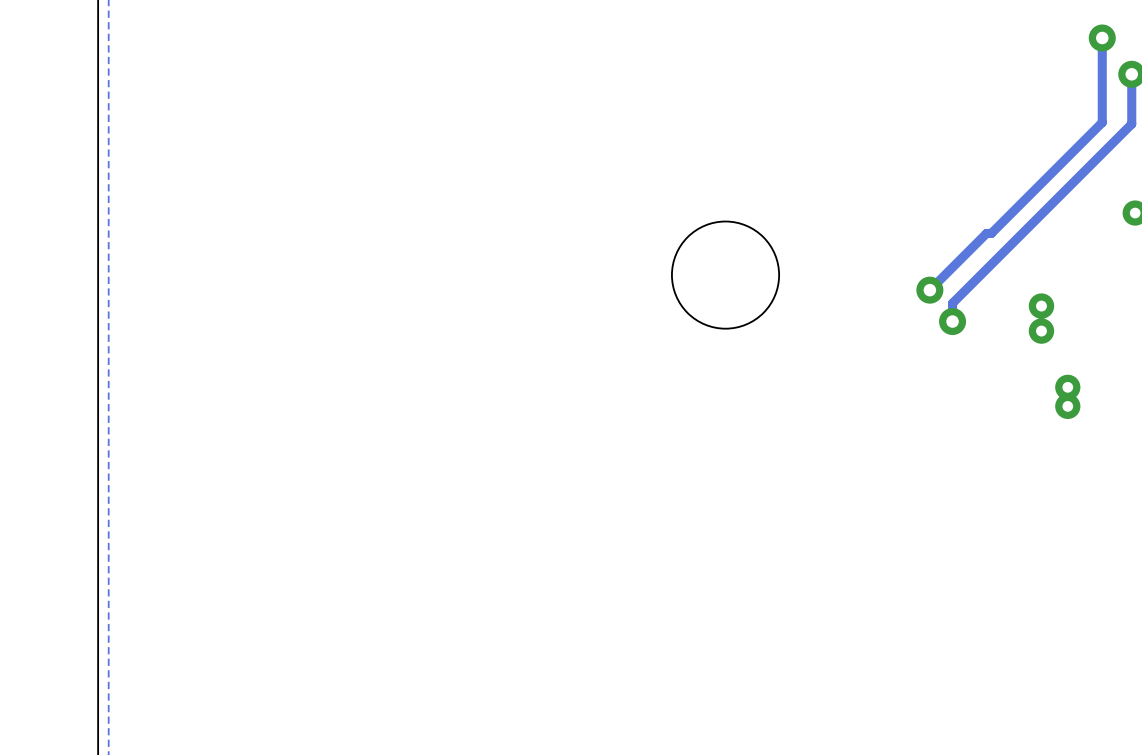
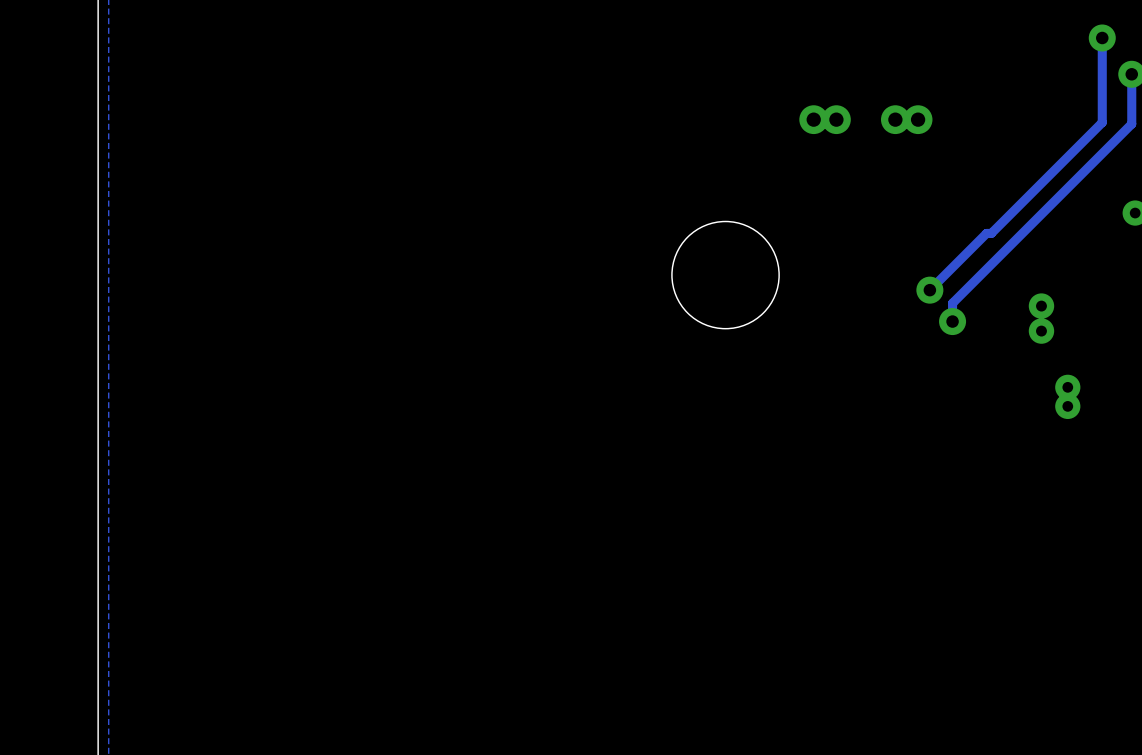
via: none -> (813, 119)
via: none -> (836, 119)
via: none -> (895, 119)
via: none -> (918, 119)

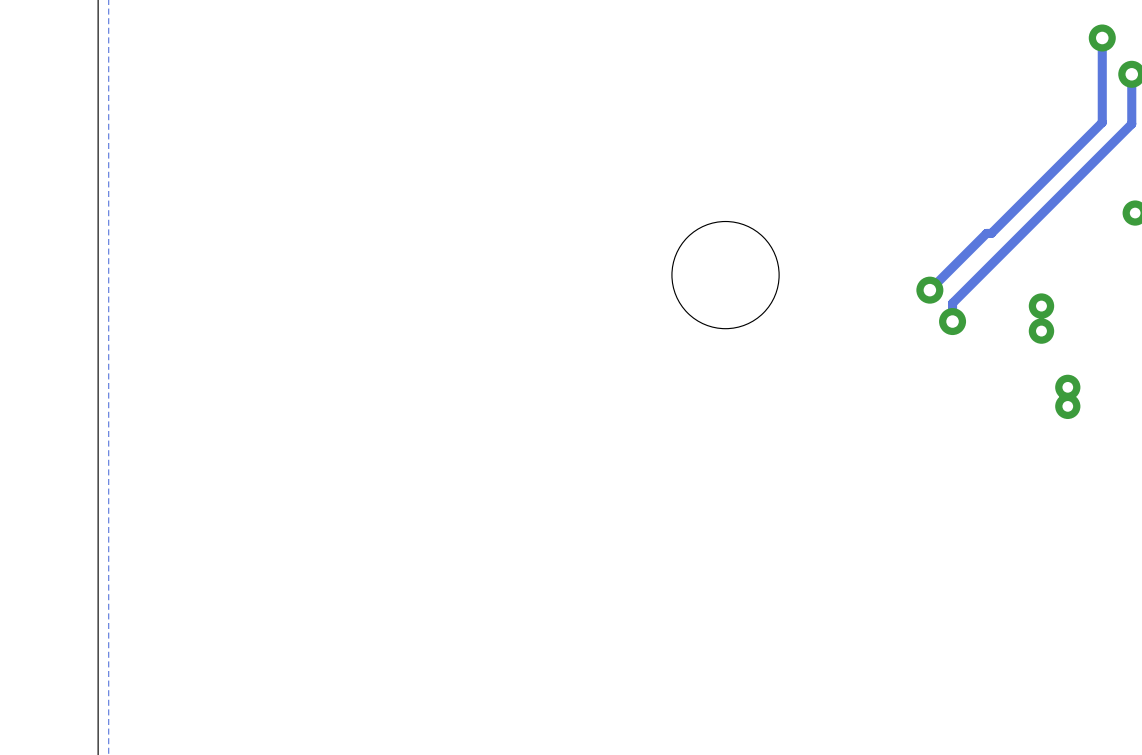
via: (813, 119) -> none
via: (836, 119) -> none
via: (895, 119) -> none
via: (918, 119) -> none

